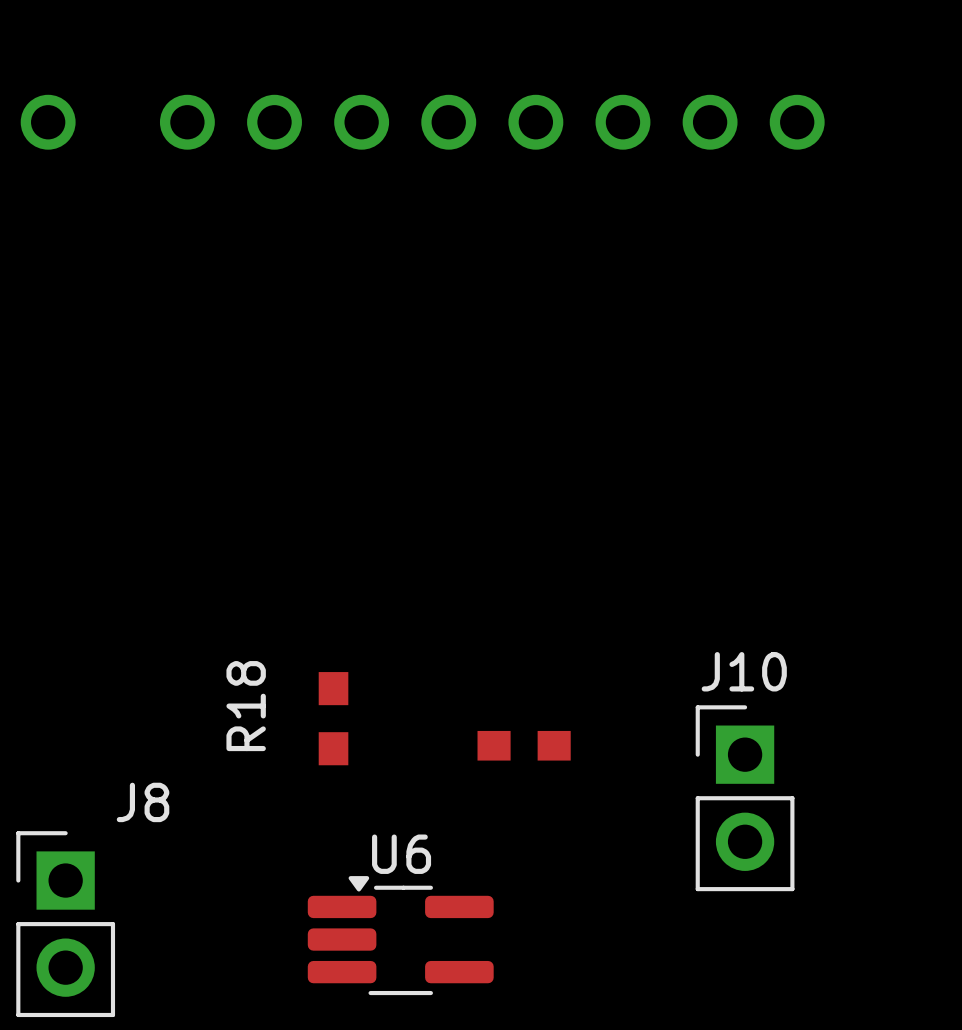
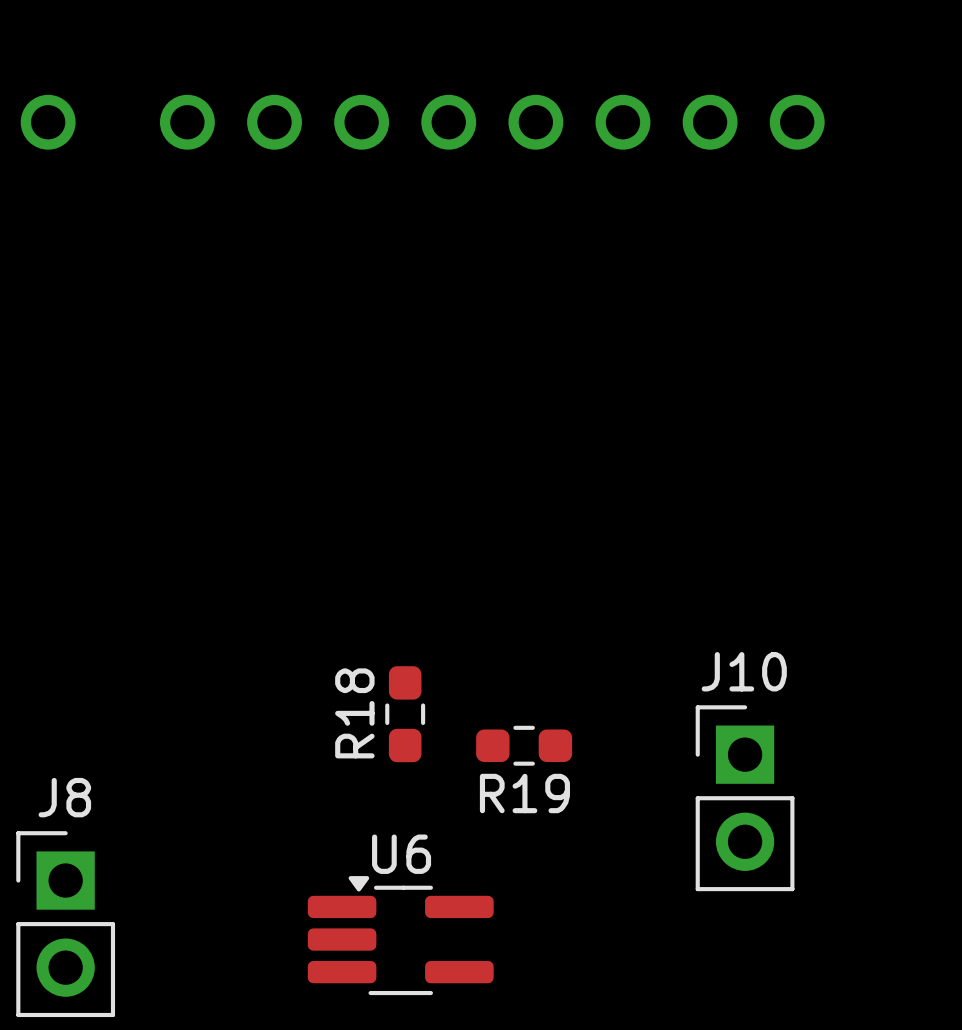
R18 footprint: [318, 672, 349, 766] -> [385, 666, 426, 763]
part: (524, 745) -> none
R19: none -> (524, 745)
J8 name position: J8 (143, 802) -> J8 (64, 797)

